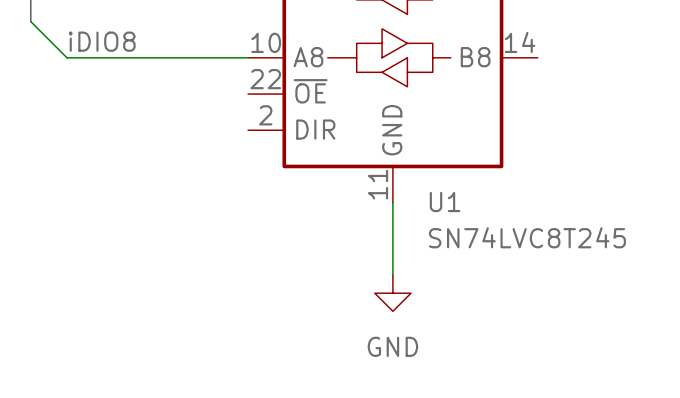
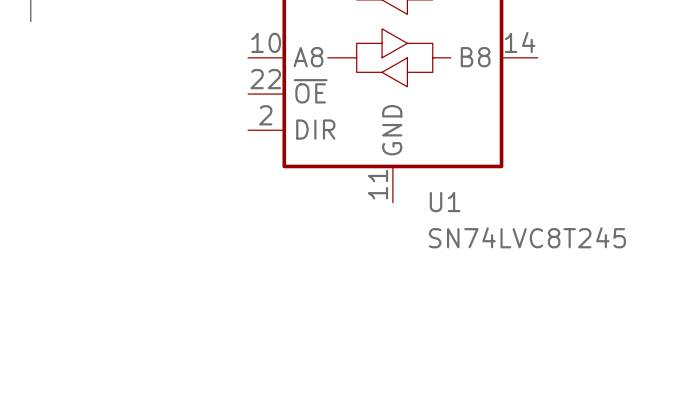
wire: (30, 21) (67, 57) (248, 57) -> none
label: iDIO8 (102, 41) -> none
wire: (392, 202) (392, 275) -> none
power symbol: GND (392, 293) -> none

